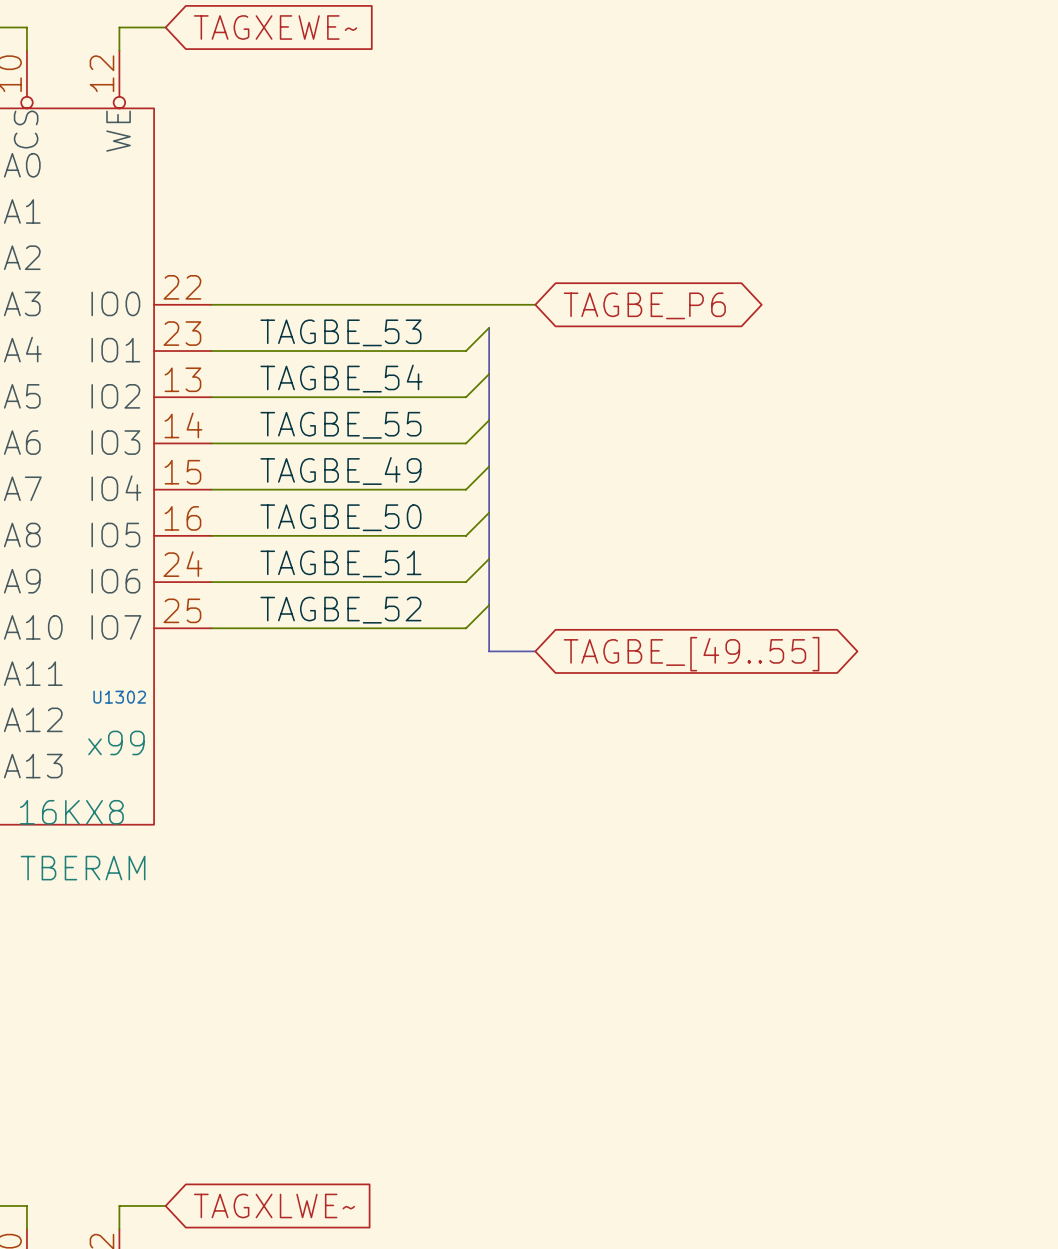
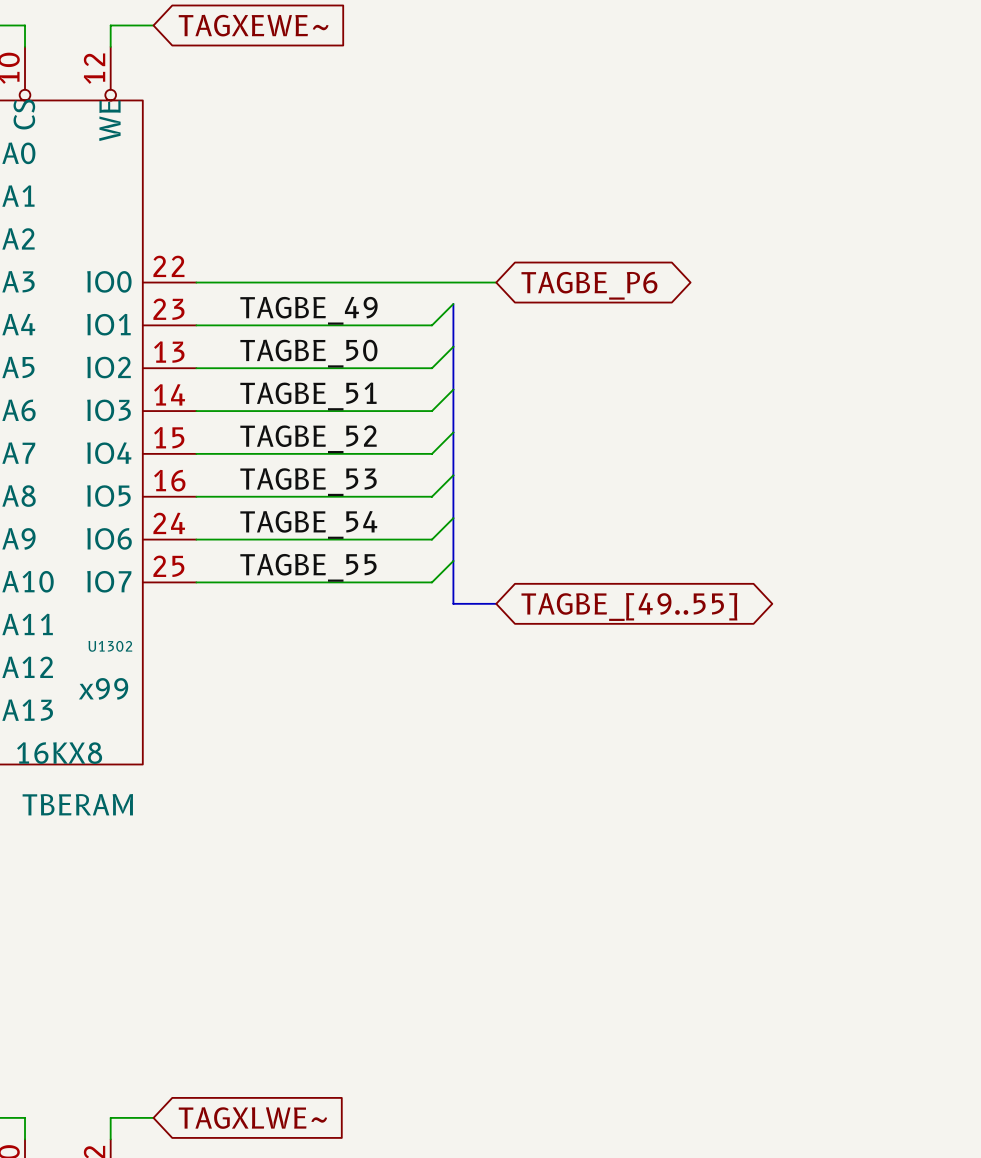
label: TAGBE_53 (340, 332) -> TAGBE_49 (308, 310)
label: TAGBE_54 (341, 378) -> TAGBE_50 (308, 353)
label: TAGBE_55 (340, 425) -> TAGBE_51 (308, 396)
label: TAGBE_49 (340, 470) -> TAGBE_52 (308, 439)
label: TAGBE_50 (340, 517) -> TAGBE_53 (308, 482)
label: TAGBE_51 (340, 563) -> TAGBE_54 (308, 524)
label: TAGBE_52 (340, 610) -> TAGBE_55 (308, 567)

